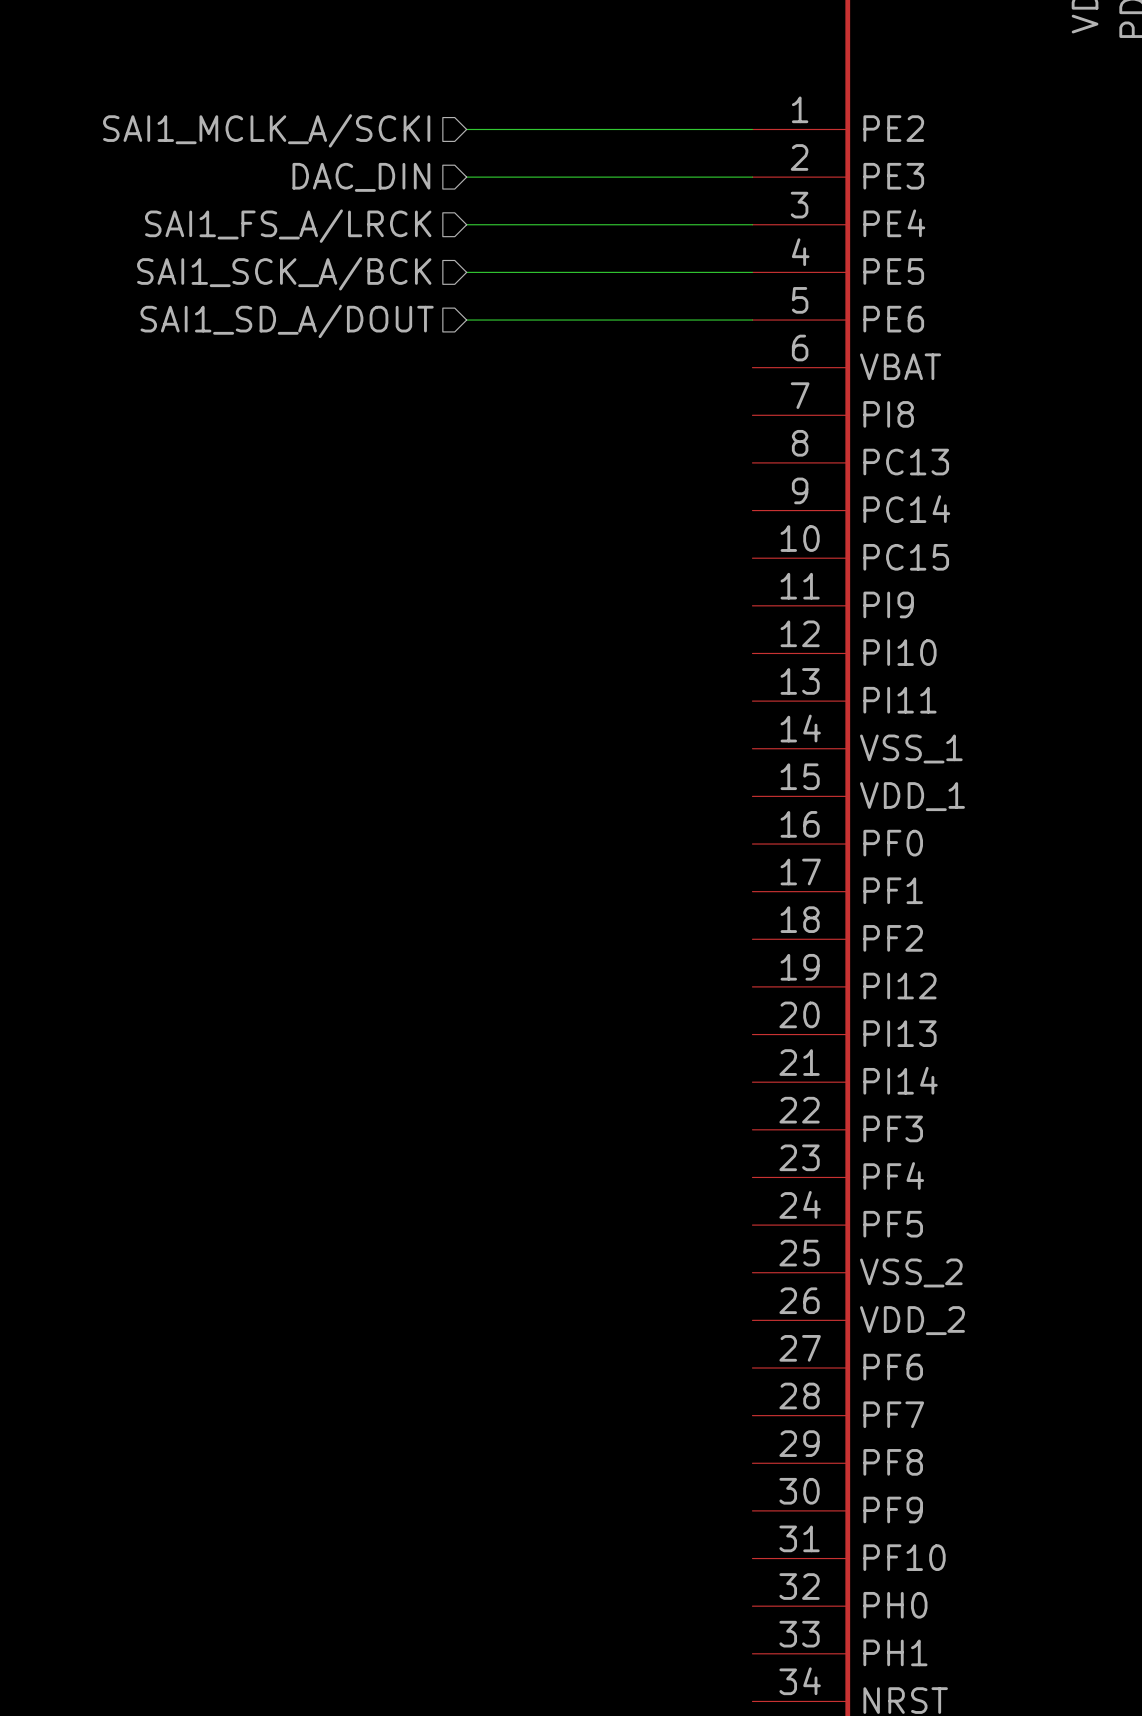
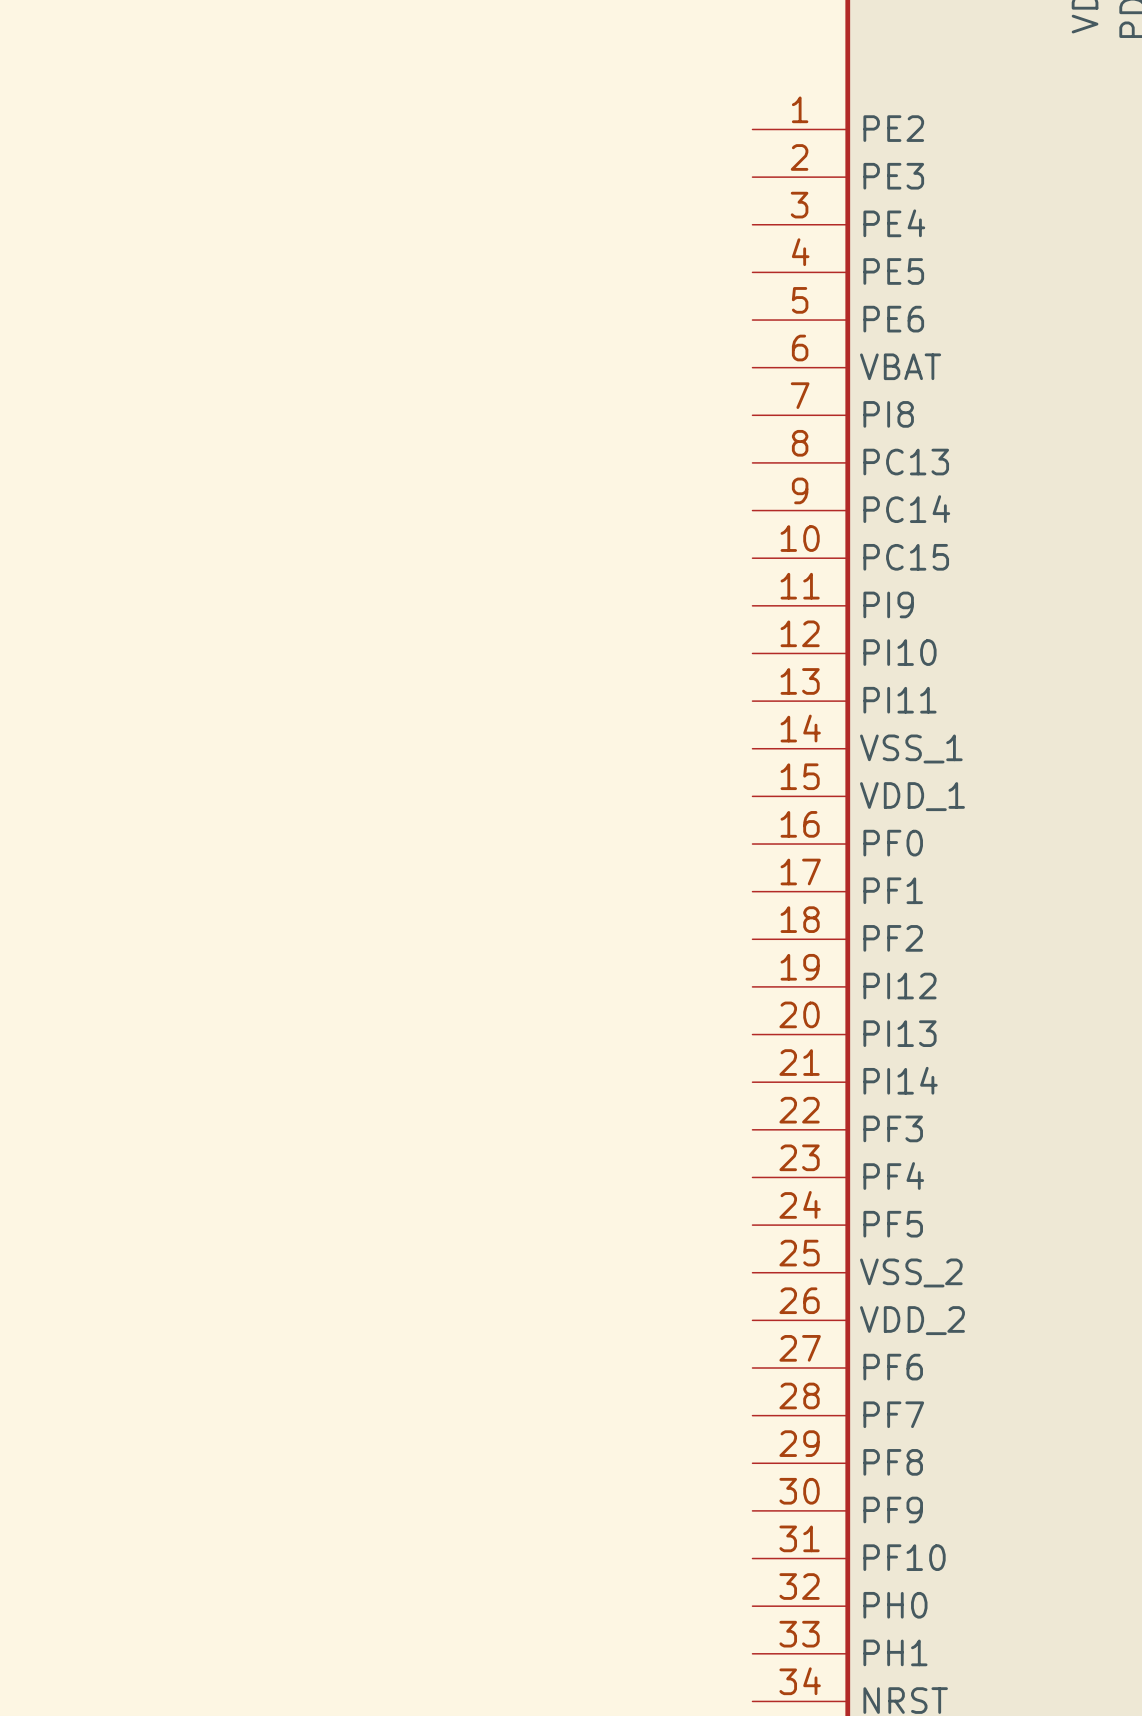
wire: (466, 129) (752, 129) -> none
hierarchical label: SAI1_MCLK_A/SCKI (266, 130) -> none
hierarchical label: DAC_DIN (361, 177) -> none
wire: (466, 177) (752, 177) -> none
wire: (466, 224) (752, 224) -> none
hierarchical label: SAI1_FS_A/LRCK (288, 226) -> none
wire: (466, 272) (752, 272) -> none
hierarchical label: SAI1_SCK_A/BCK (284, 273) -> none
wire: (466, 320) (752, 320) -> none
hierarchical label: SAI1_SD_A/DOUT (287, 321) -> none

